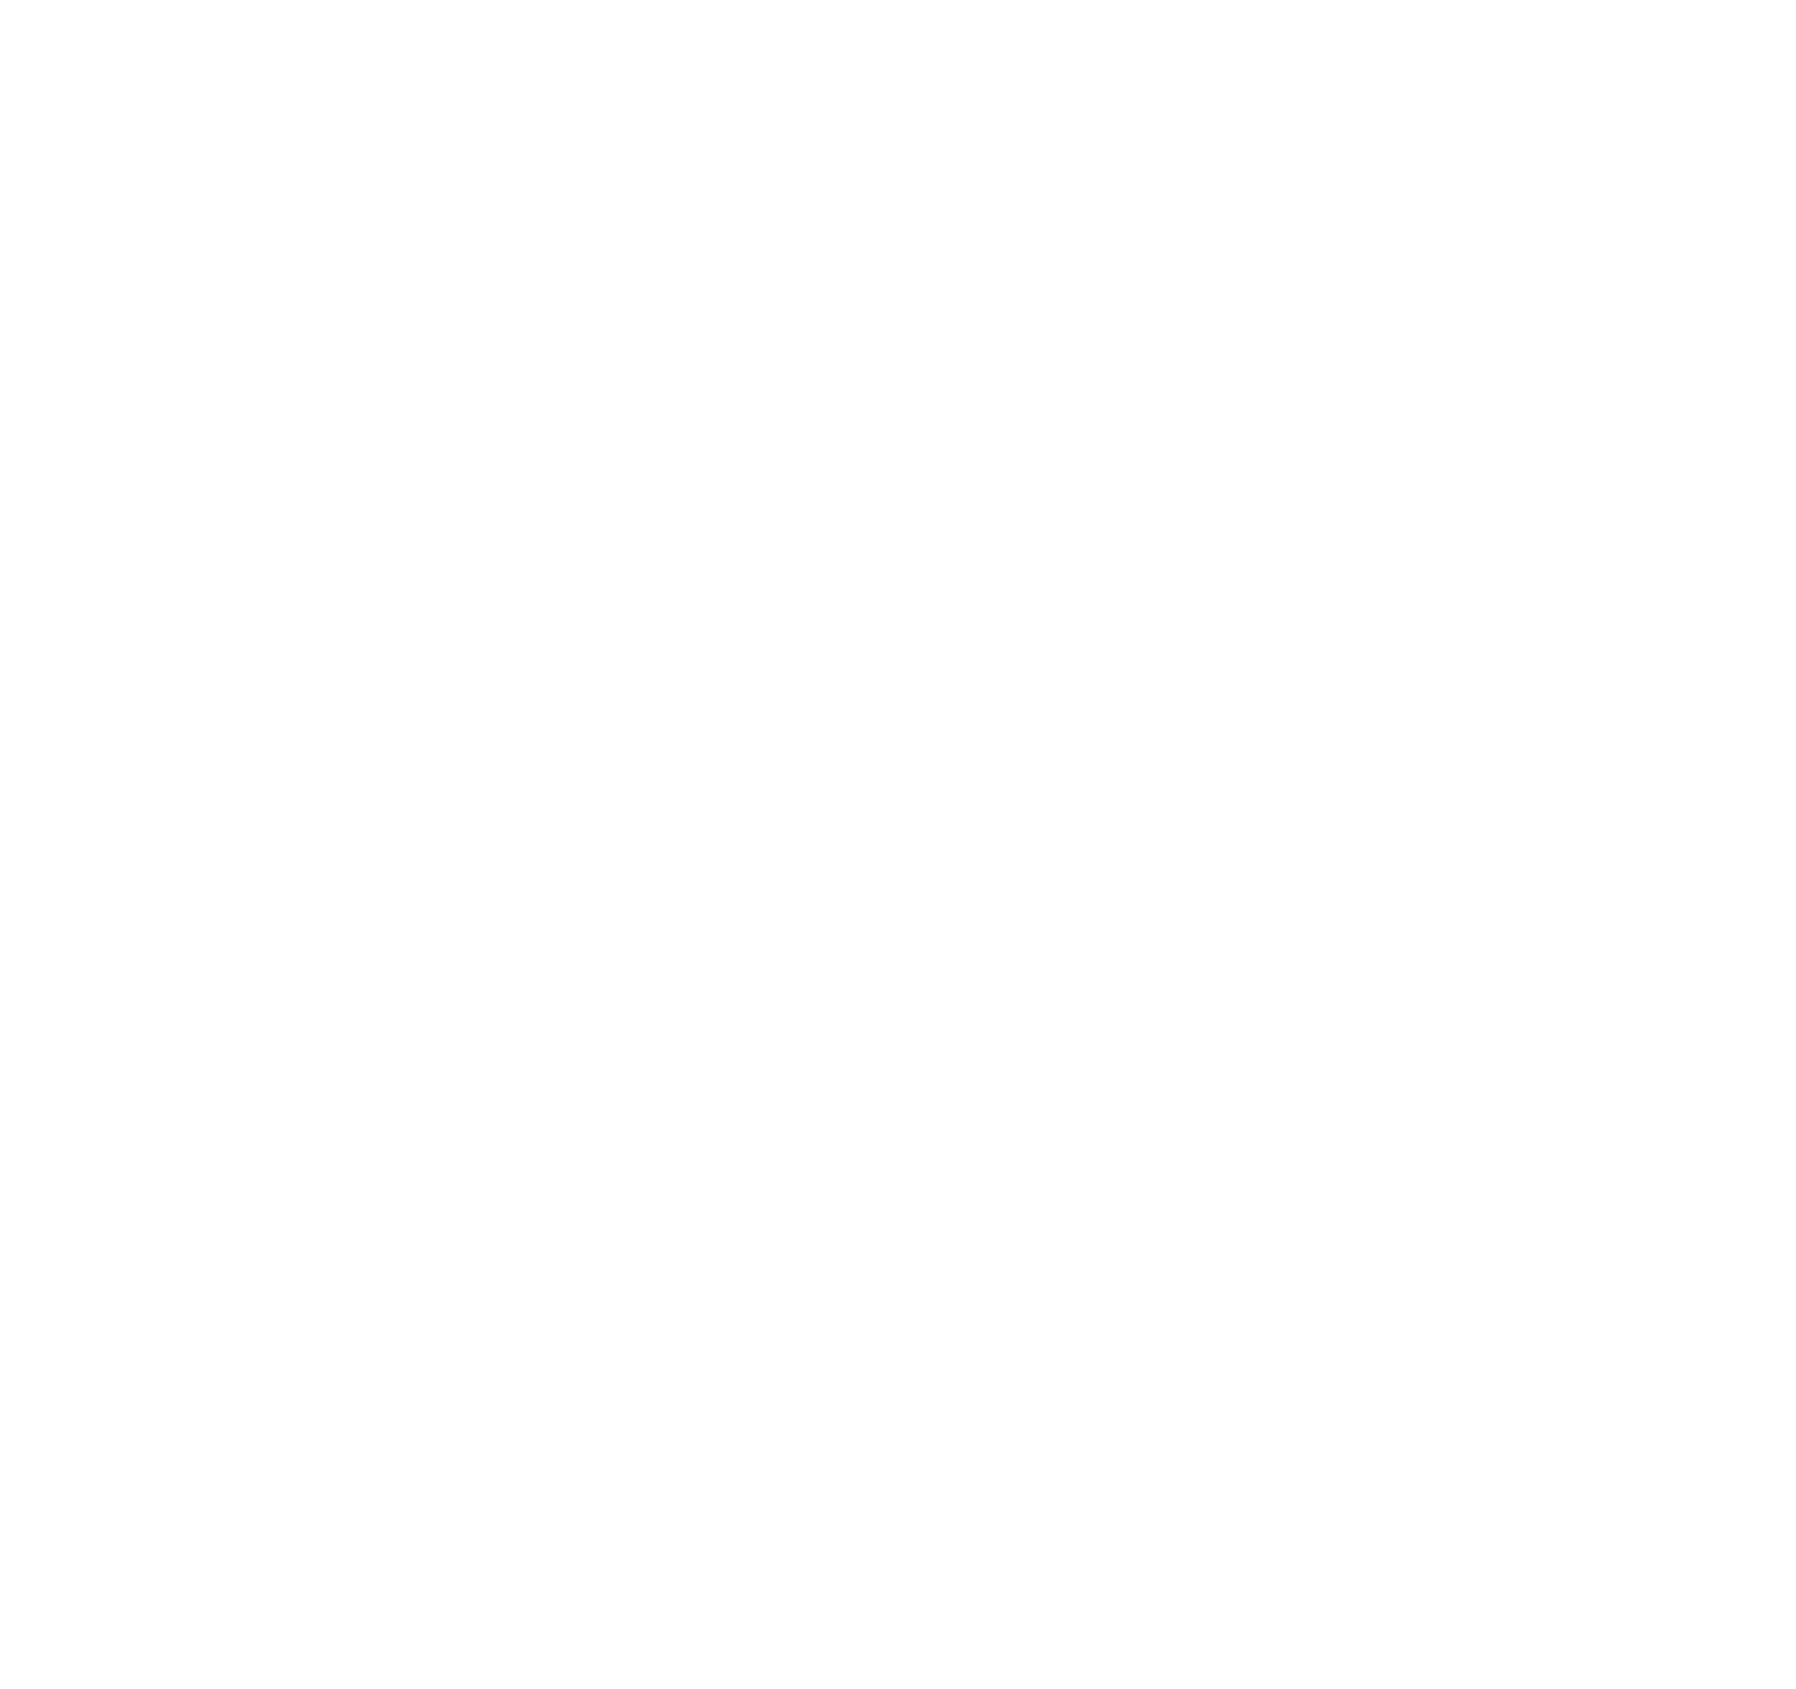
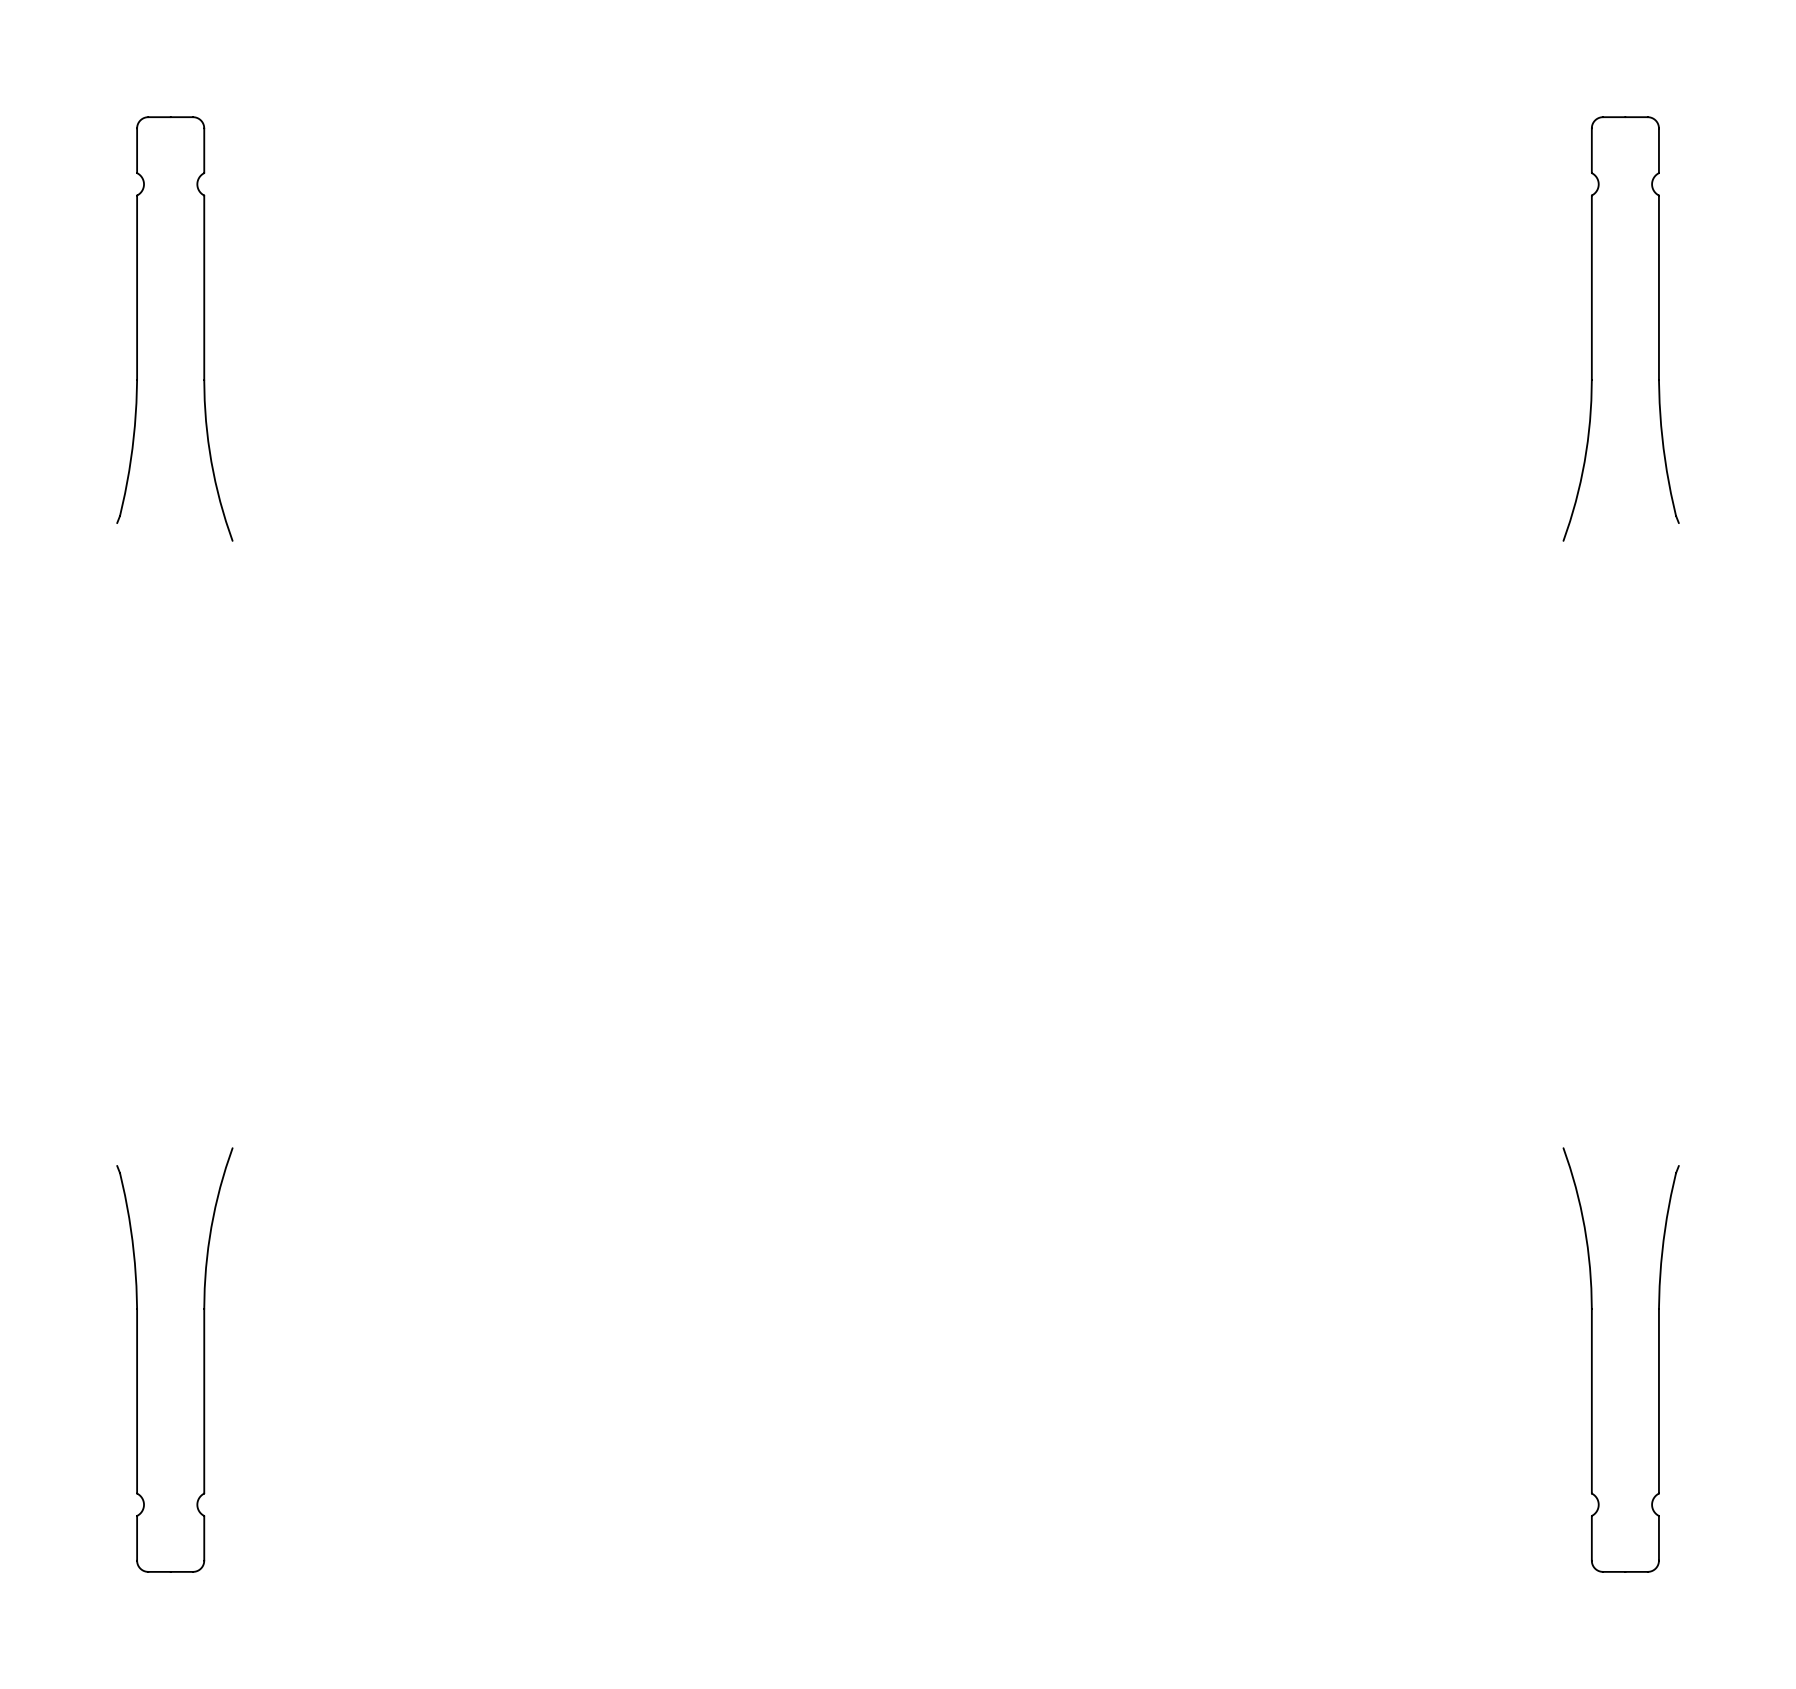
drawing: none -> [116, 116, 1680, 1573]

